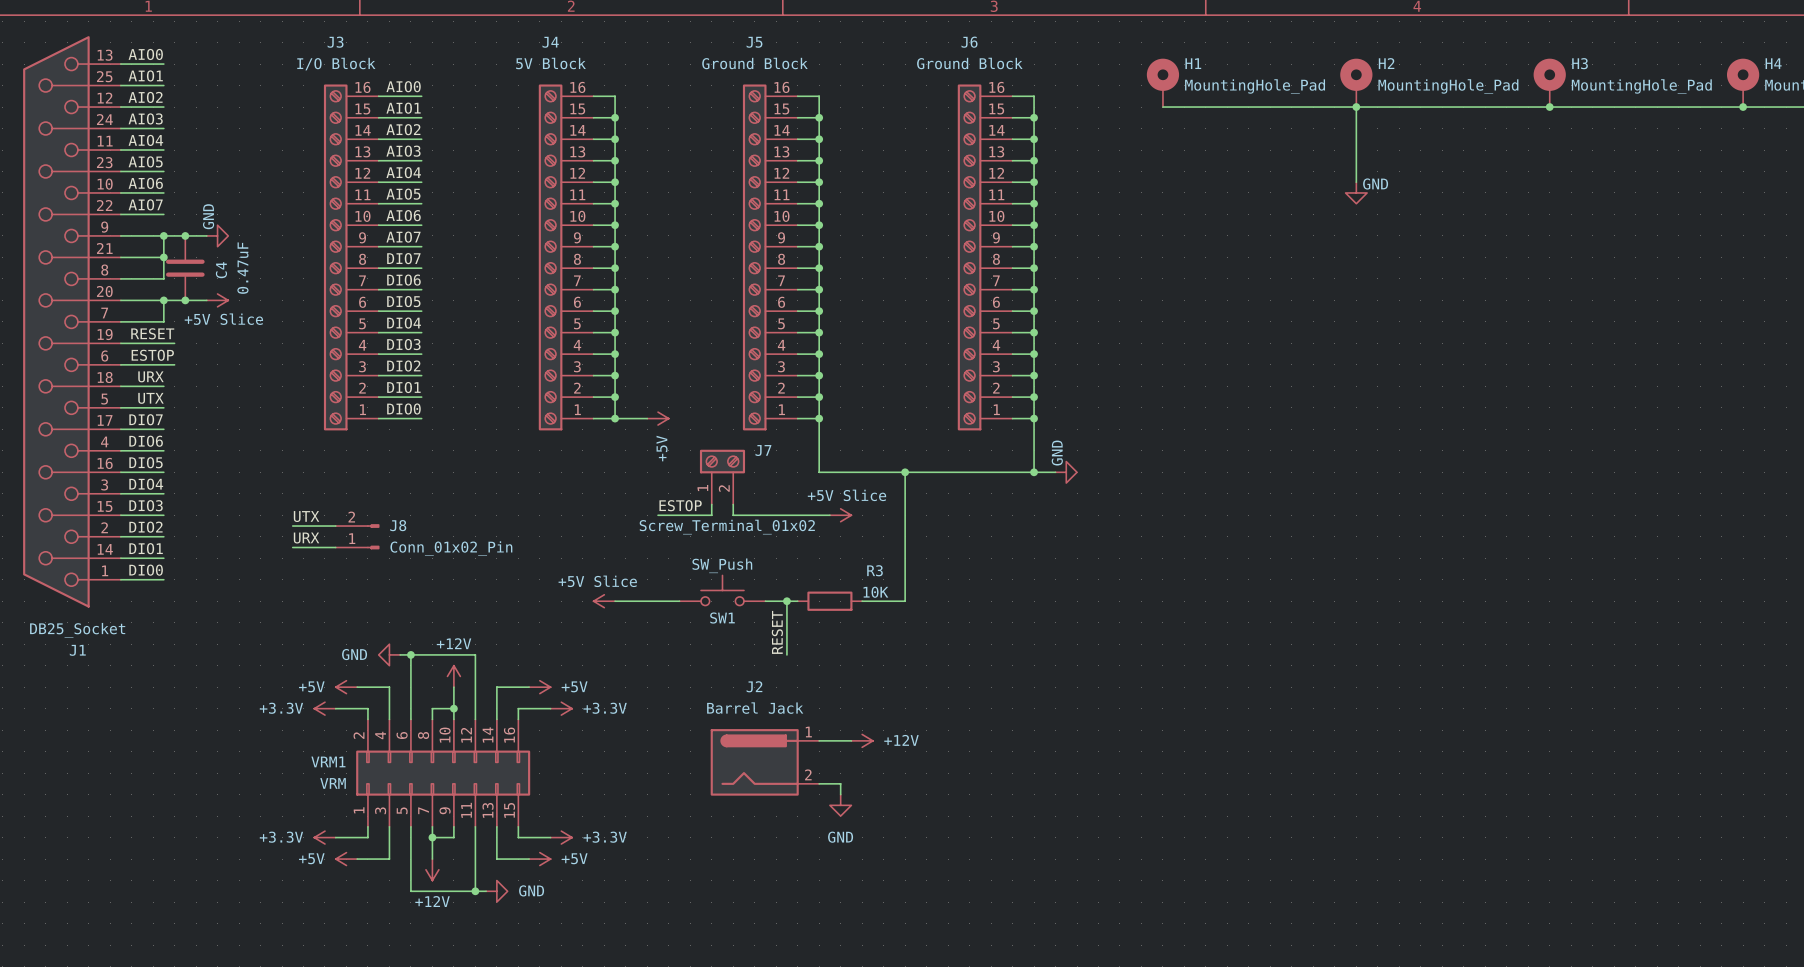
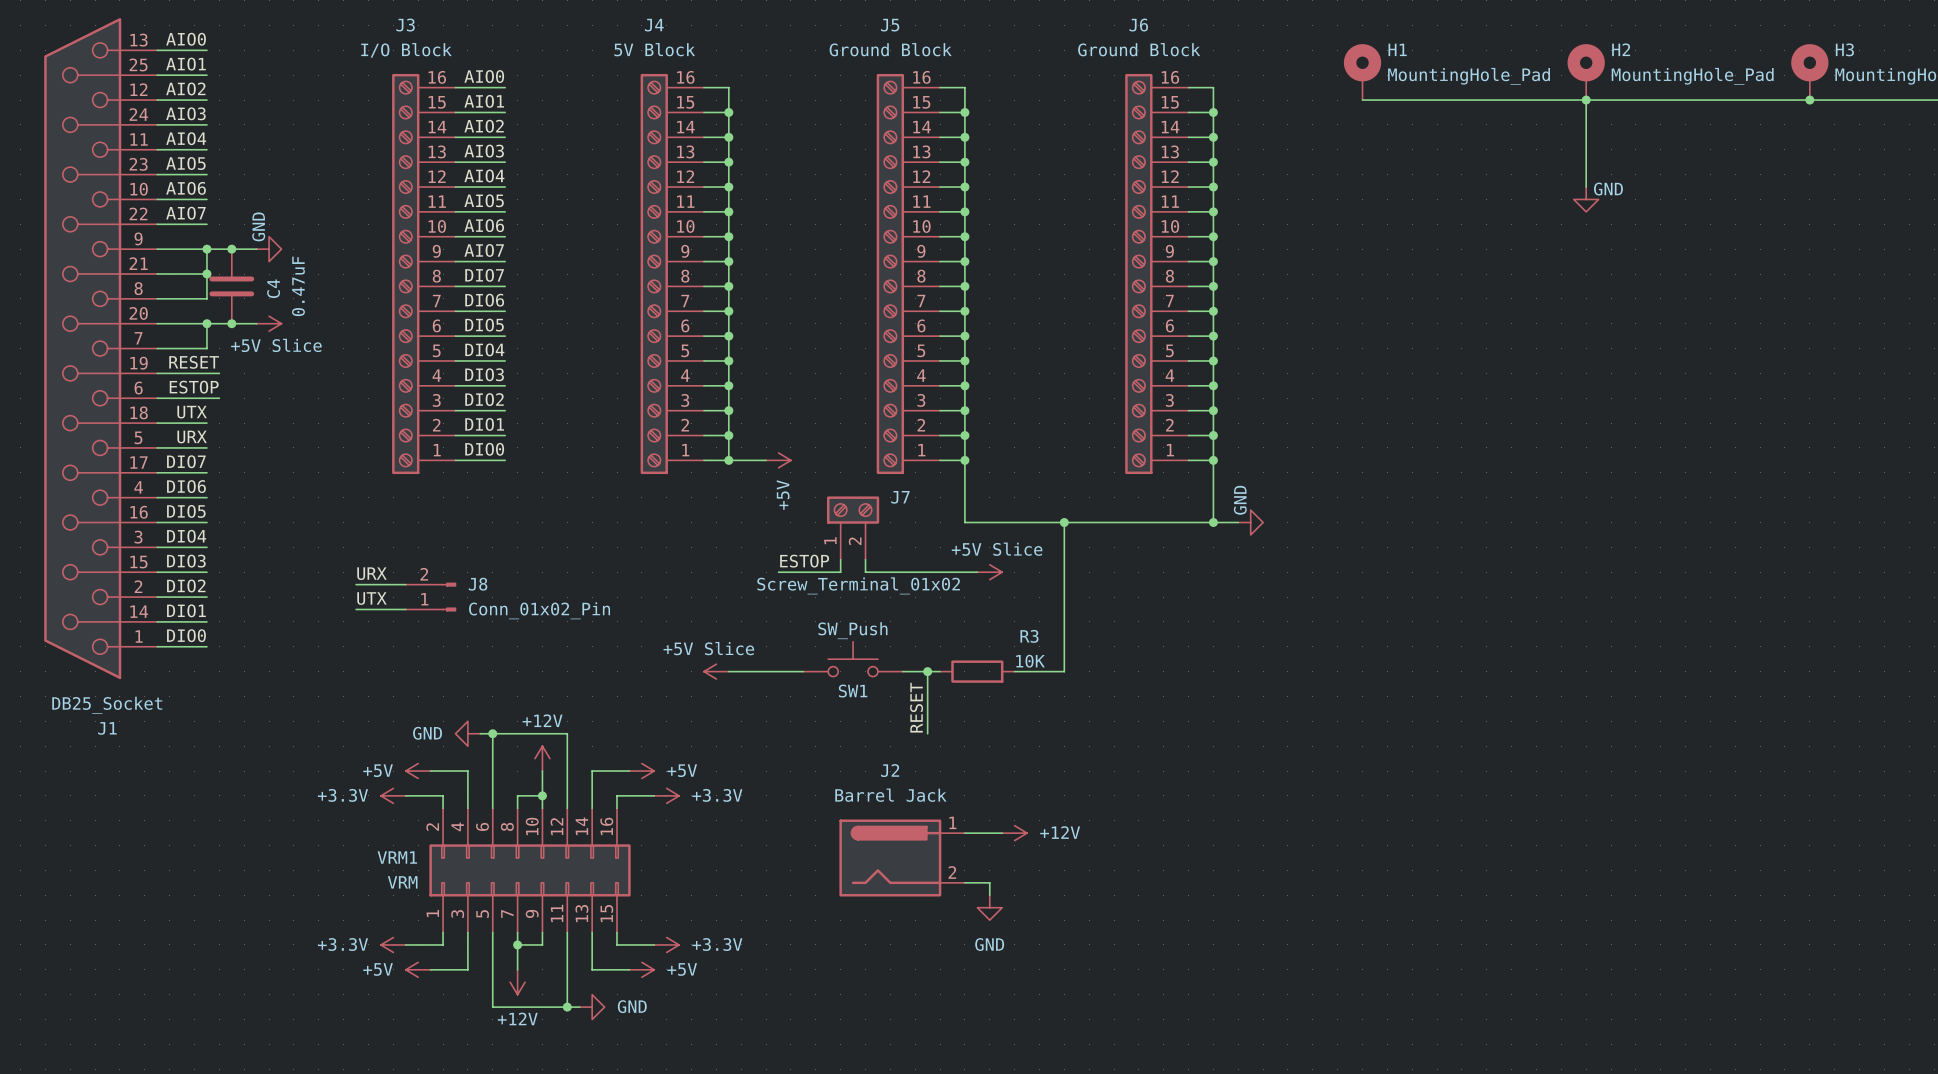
label: URX (150, 376) -> UTX (192, 412)
label: UTX (150, 398) -> URX (192, 436)
label: UTX (306, 516) -> URX (371, 573)
label: URX (306, 538) -> UTX (371, 598)

